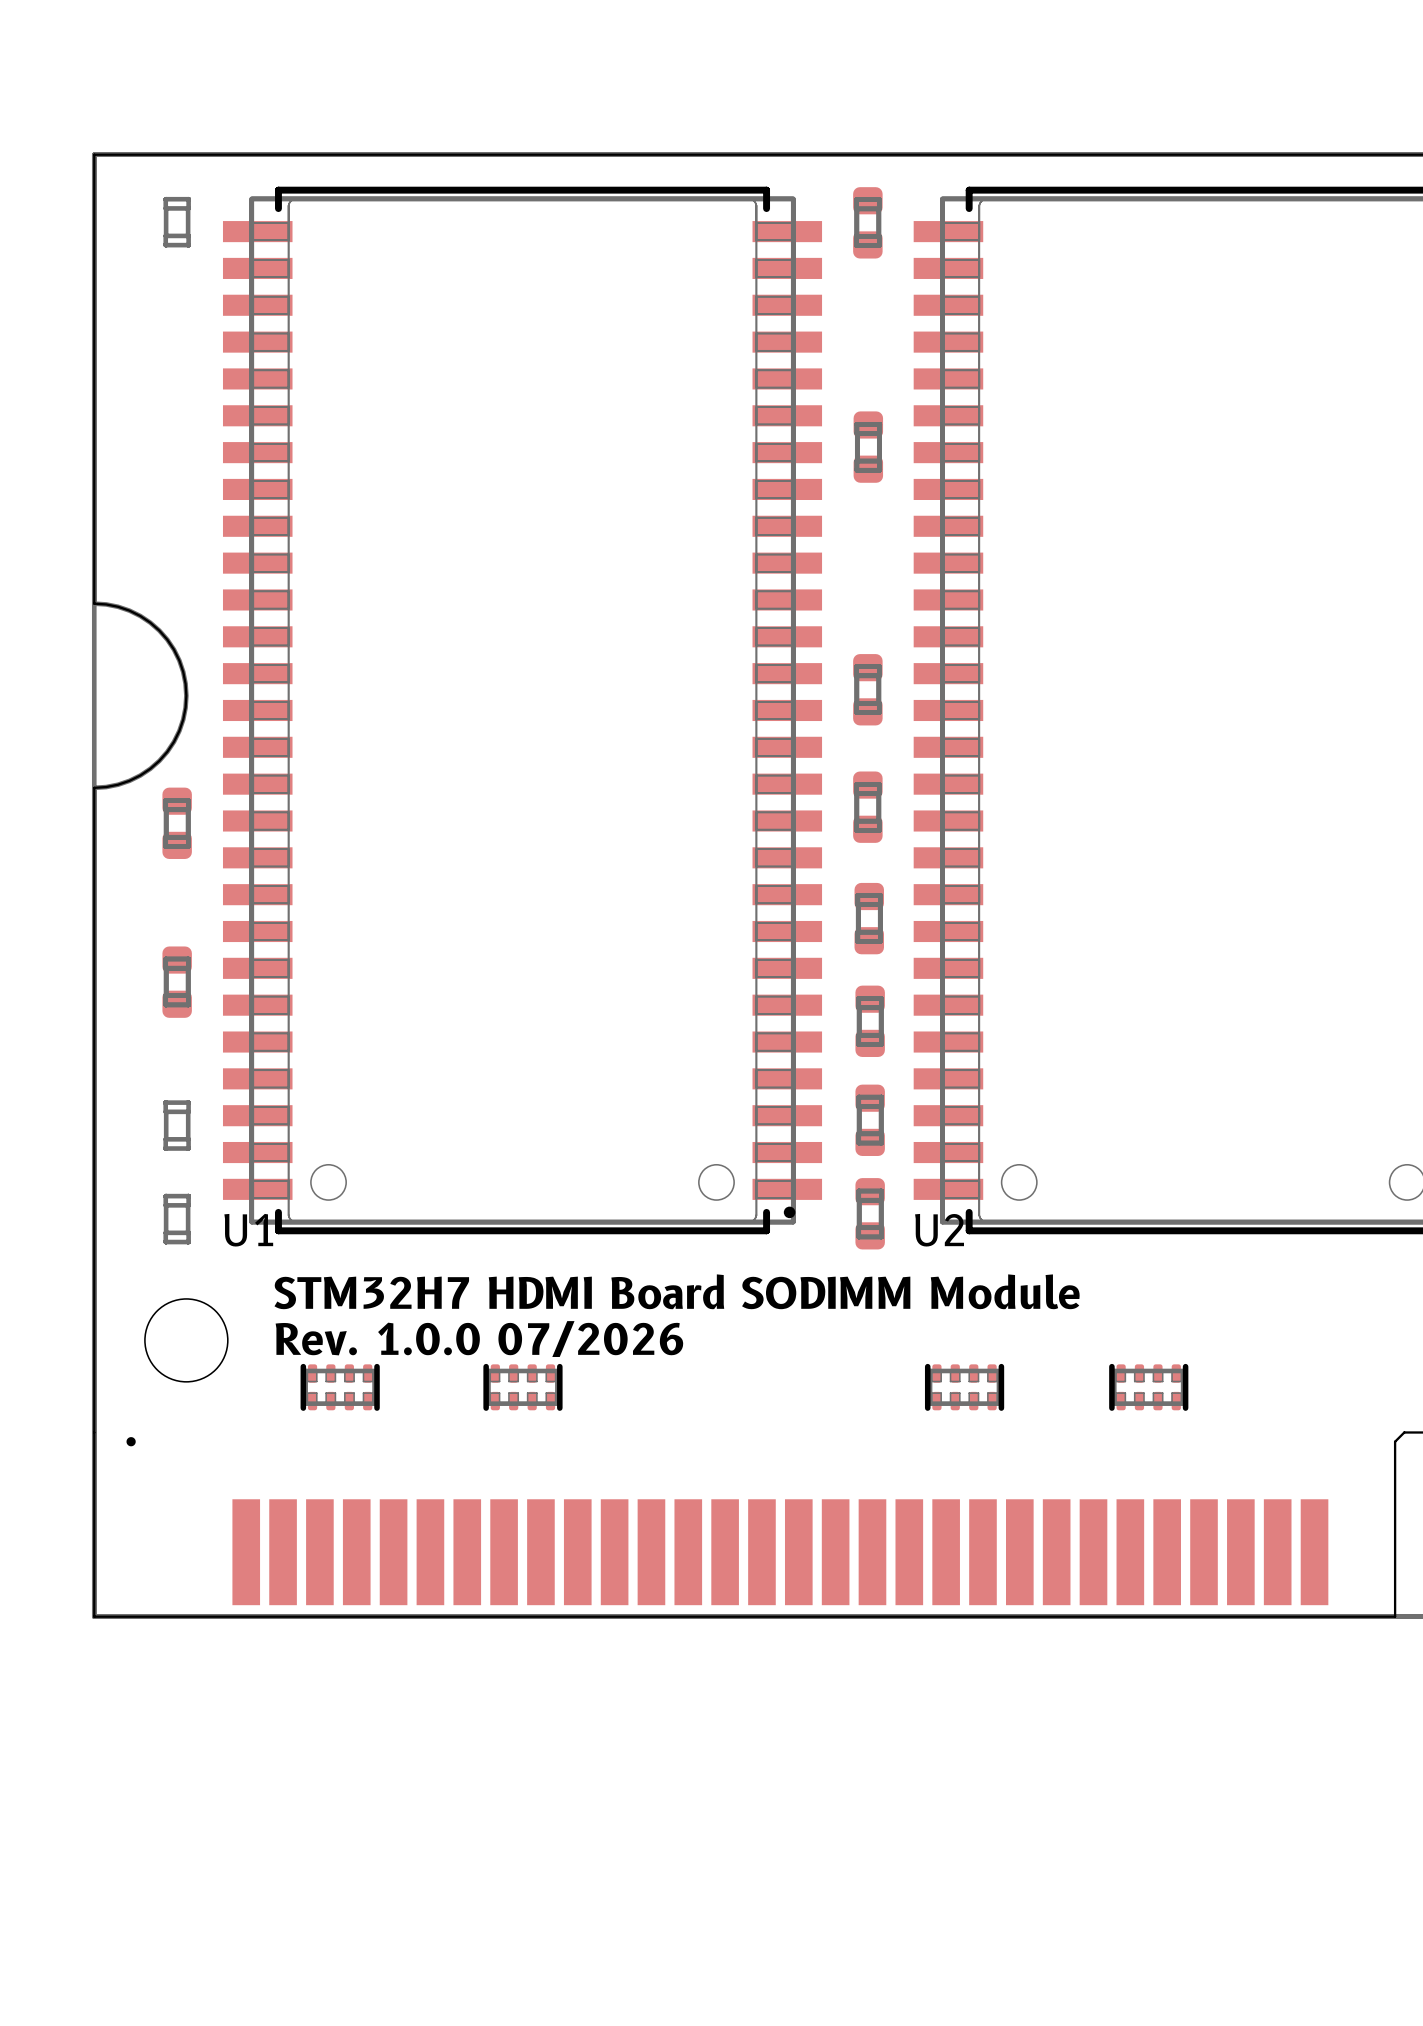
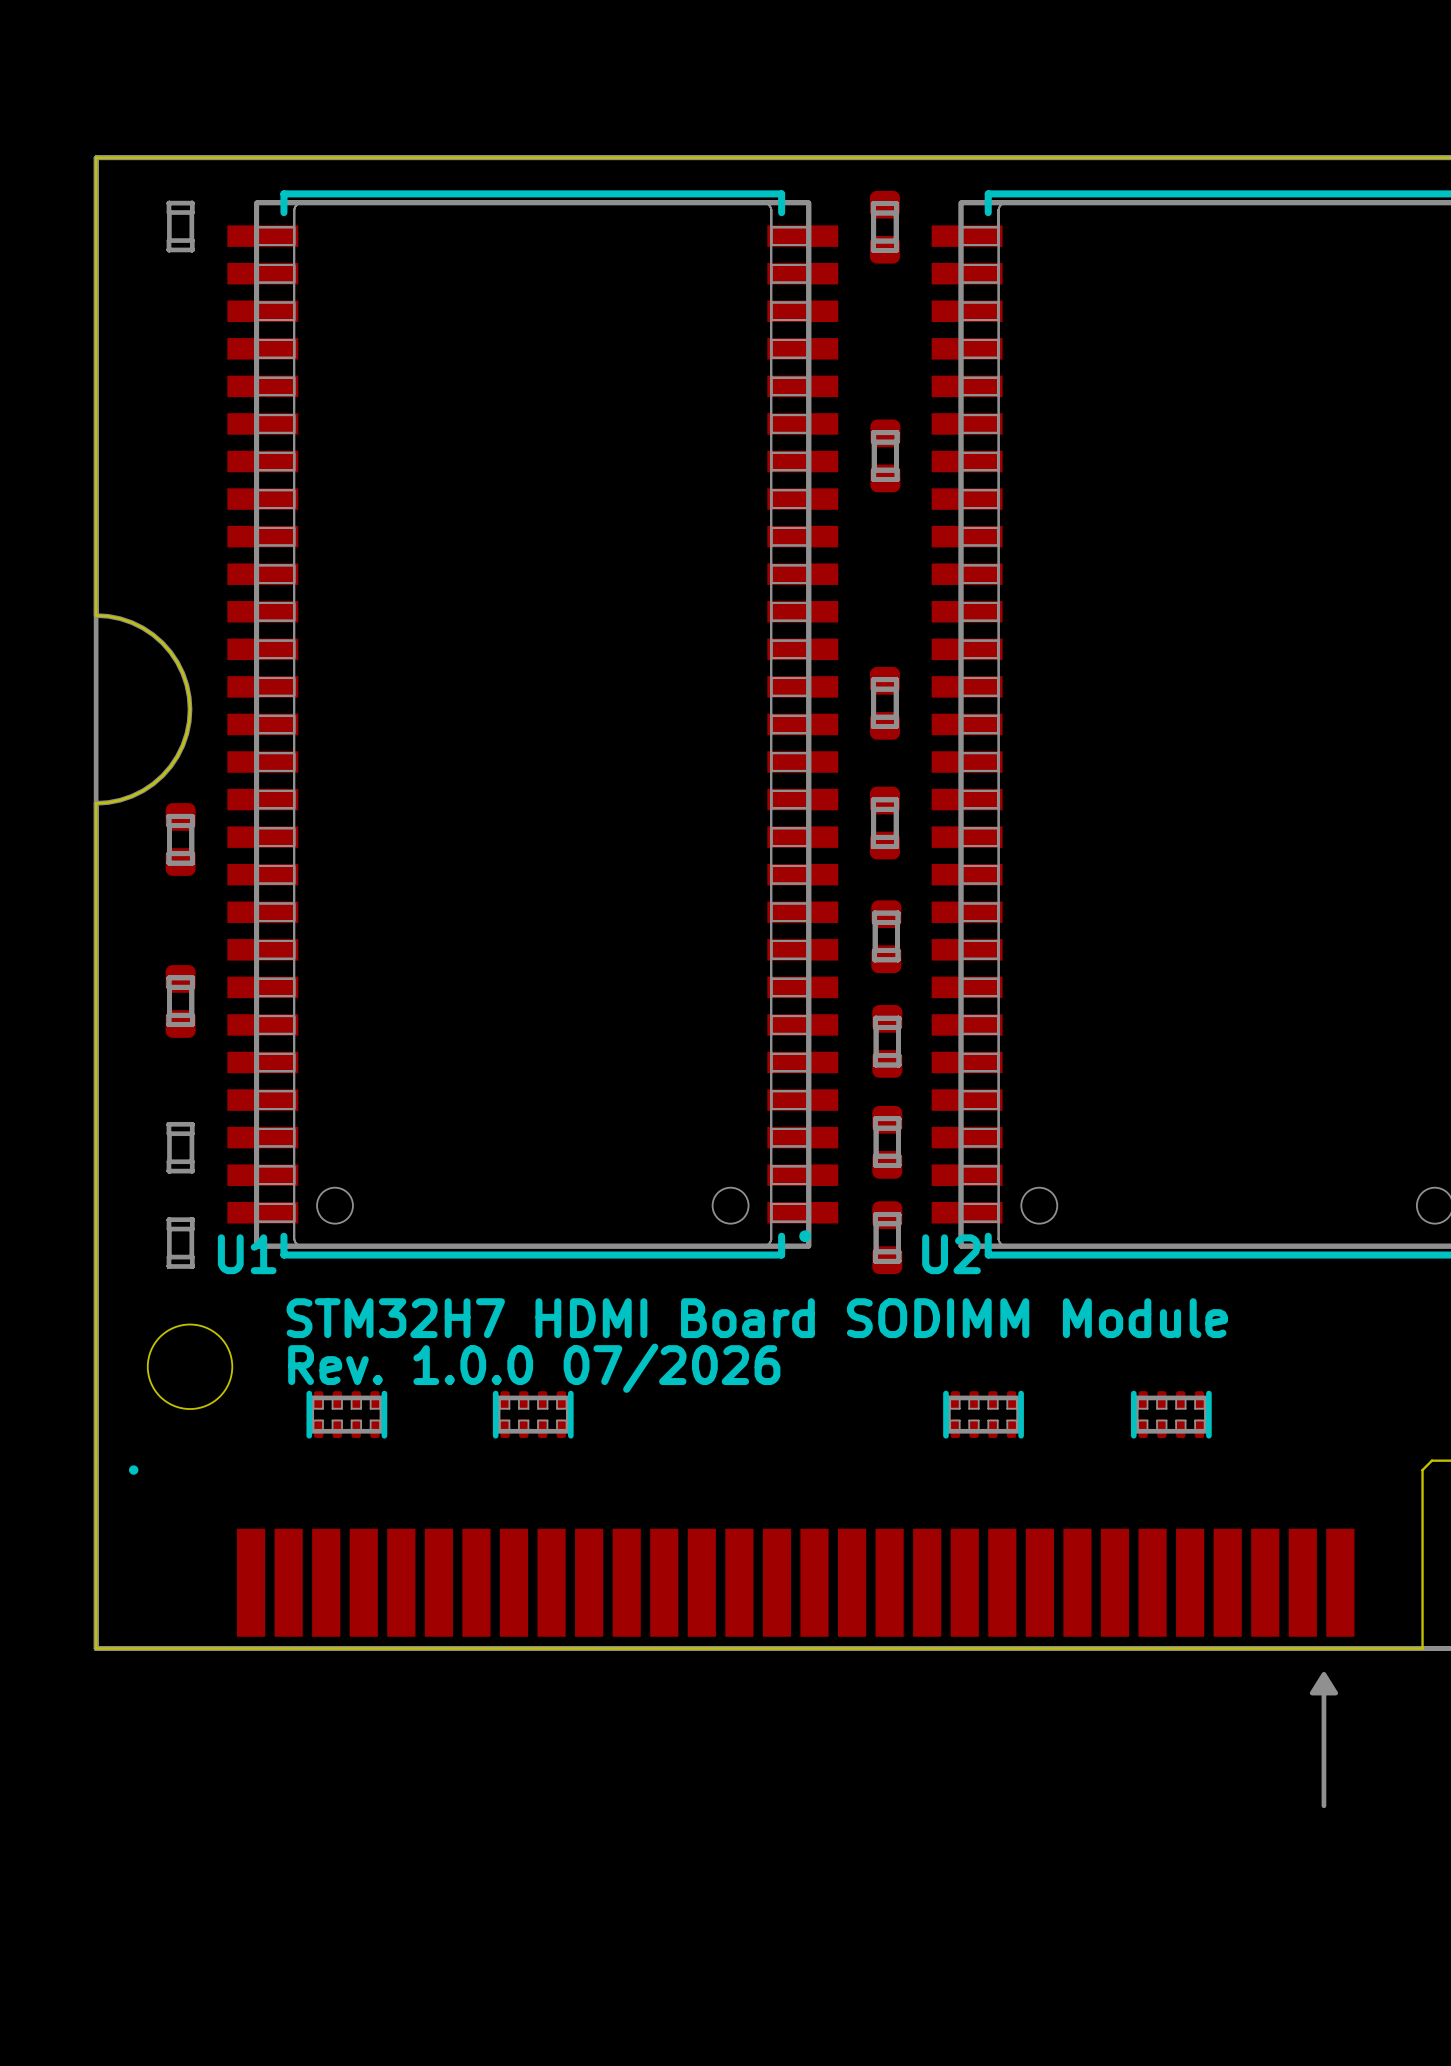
drawing: none -> [1309, 1671, 1339, 1696]
line: none -> (1323, 1695) (1323, 1805)

